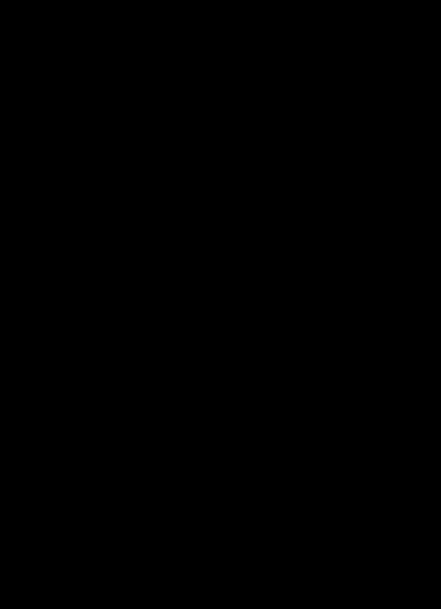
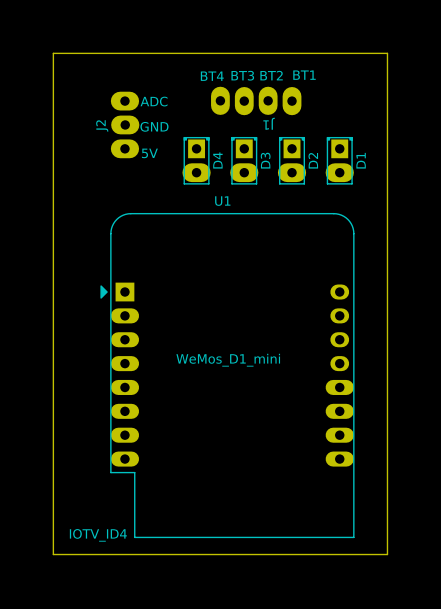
board edge: none -> (53, 53) (387, 53) (387, 554) (53, 554) (53, 53)
text: none -> BT4 (212, 76)
text: none -> BT3 (242, 75)
text: none -> BT2 (271, 75)
text: none -> BT1 (304, 75)
J1: none -> (256, 100)
text: none -> ADC (154, 101)
J2: none -> (125, 124)
text: none -> GND (154, 126)
text: none -> 5V (149, 153)
D4: none -> (196, 160)
D3: none -> (244, 160)
D2: none -> (292, 160)
D1: none -> (339, 160)
text: none -> WeMos_D1_mini (228, 360)
U1: none -> (227, 375)
text: none -> IOTV_ID4 (98, 535)

